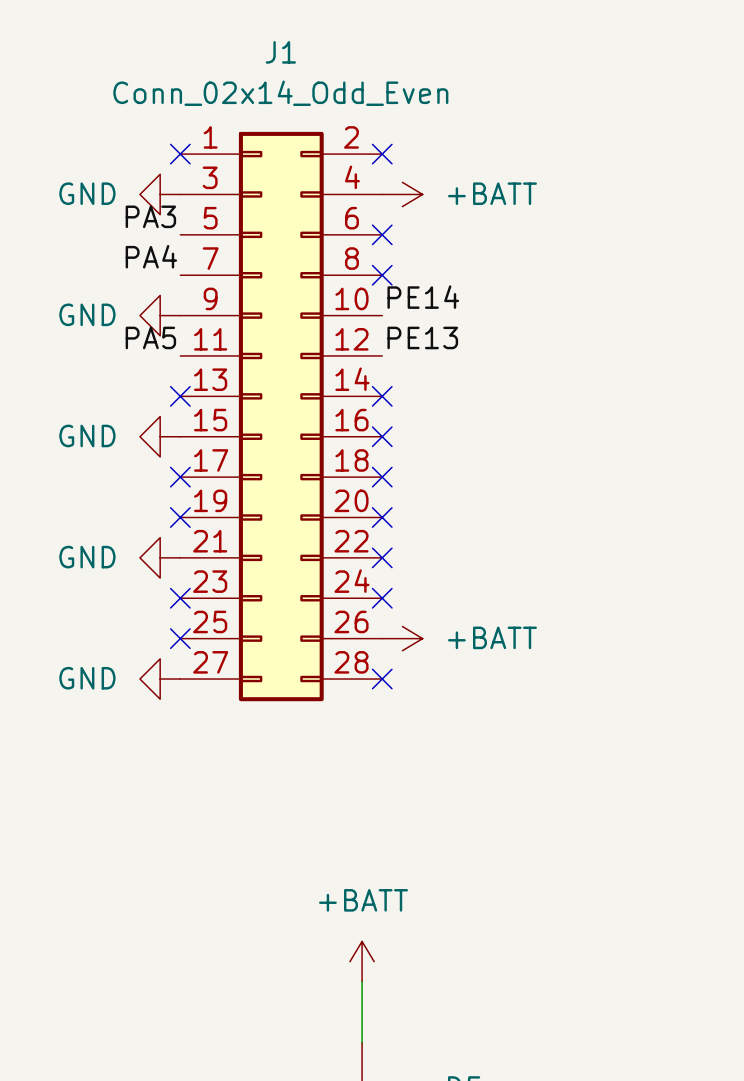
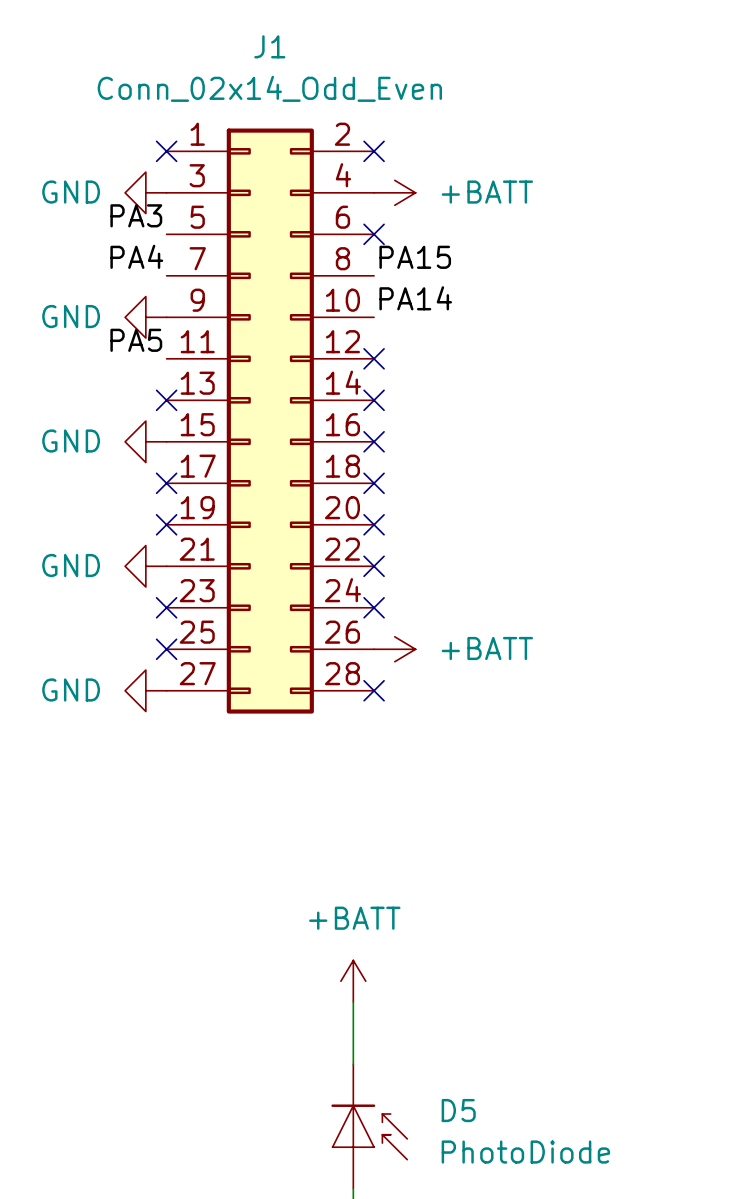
label: none -> PA15 (415, 257)
no-connect mark position: (382, 275) -> (374, 358)
label: PE14 (423, 297) -> PA14 (415, 298)
label: PE13 (422, 337) -> none

